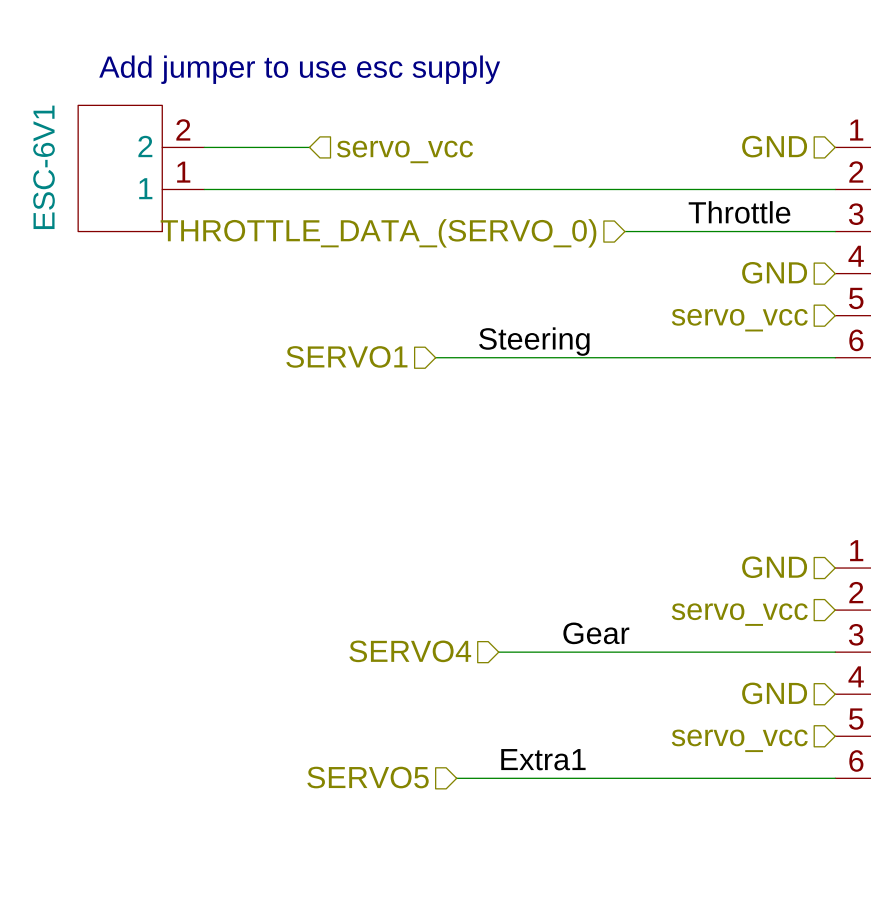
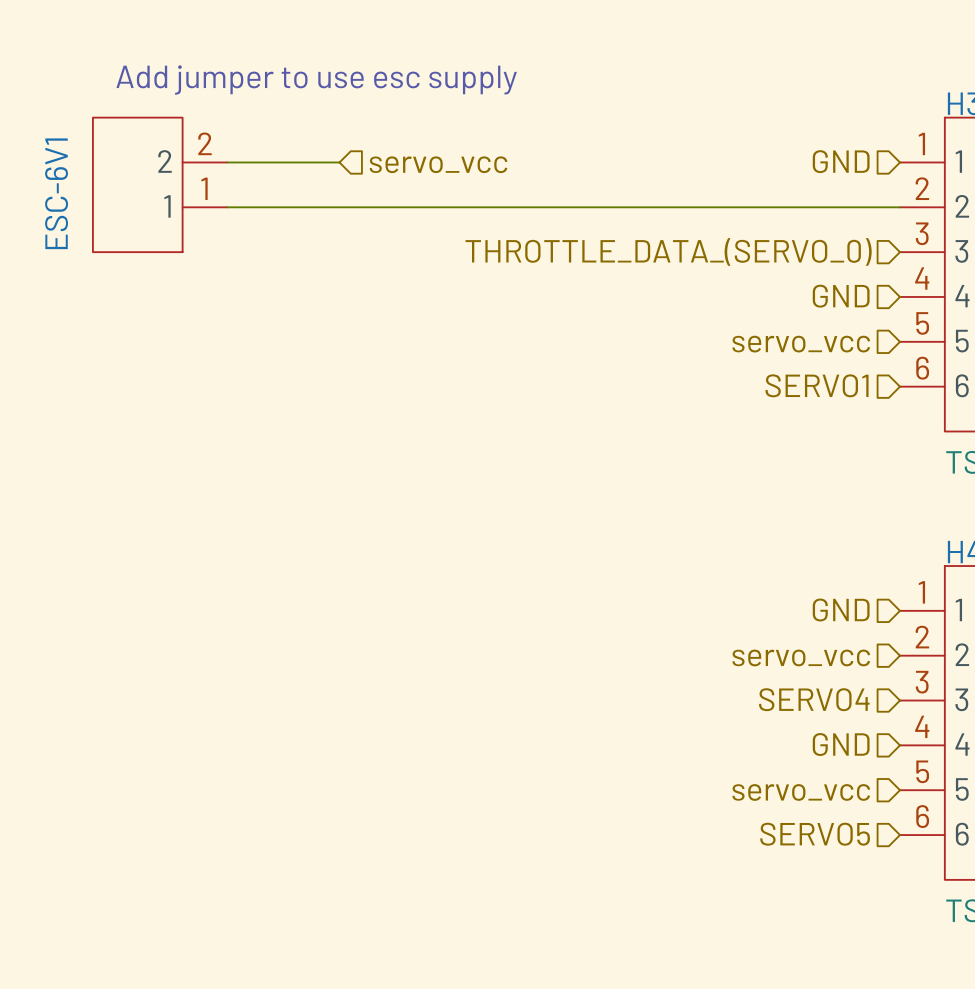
label: Throttle (739, 212) -> none
wire: (624, 231) (835, 231) -> none
hierarchical label position: THROTTLE_DATA_(SERVO_0) (378, 233) -> THROTTLE_DATA_(SERVO_0) (668, 251)
label: Steering (534, 341) -> none
hierarchical label position: SERVO1 (346, 356) -> SERVO1 (817, 385)
wire: (435, 357) (835, 357) -> none
label: Gear (596, 633) -> none
hierarchical label position: SERVO4 (410, 651) -> SERVO4 (814, 699)
wire: (498, 652) (835, 652) -> none
label: Extra1 (543, 759) -> none
hierarchical label position: SERVO5 (368, 777) -> SERVO5 (815, 834)
wire: (456, 778) (835, 778) -> none

